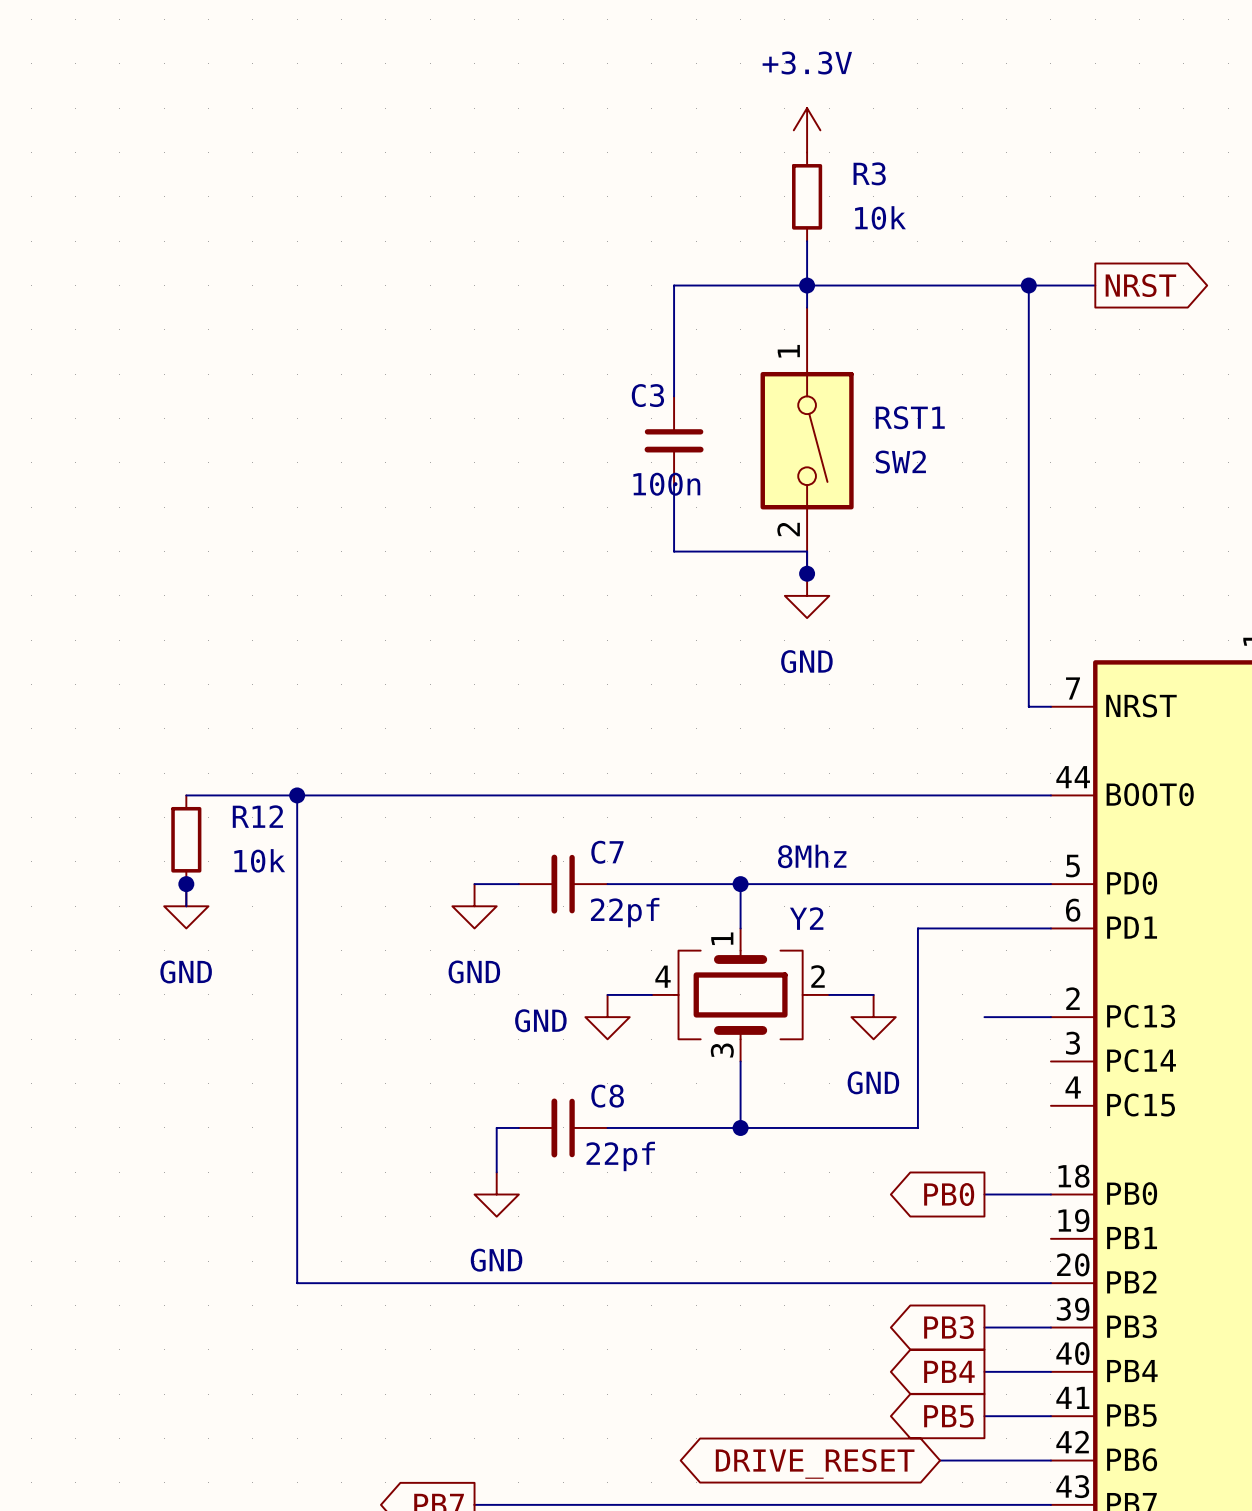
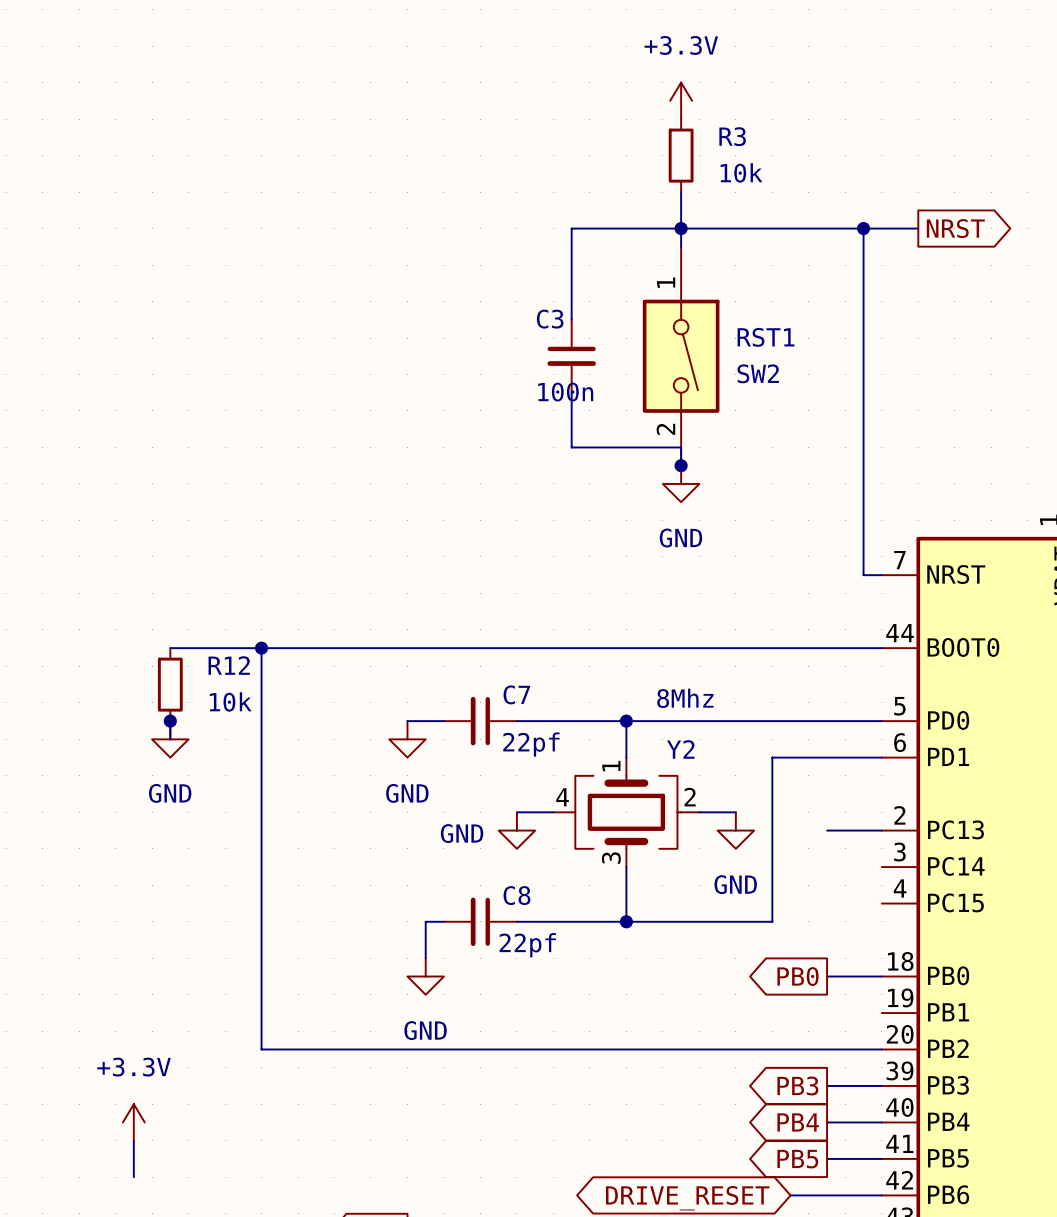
power symbol: none -> +3.3V (133, 1122)
wire: none -> (133, 1140) (133, 1177)

